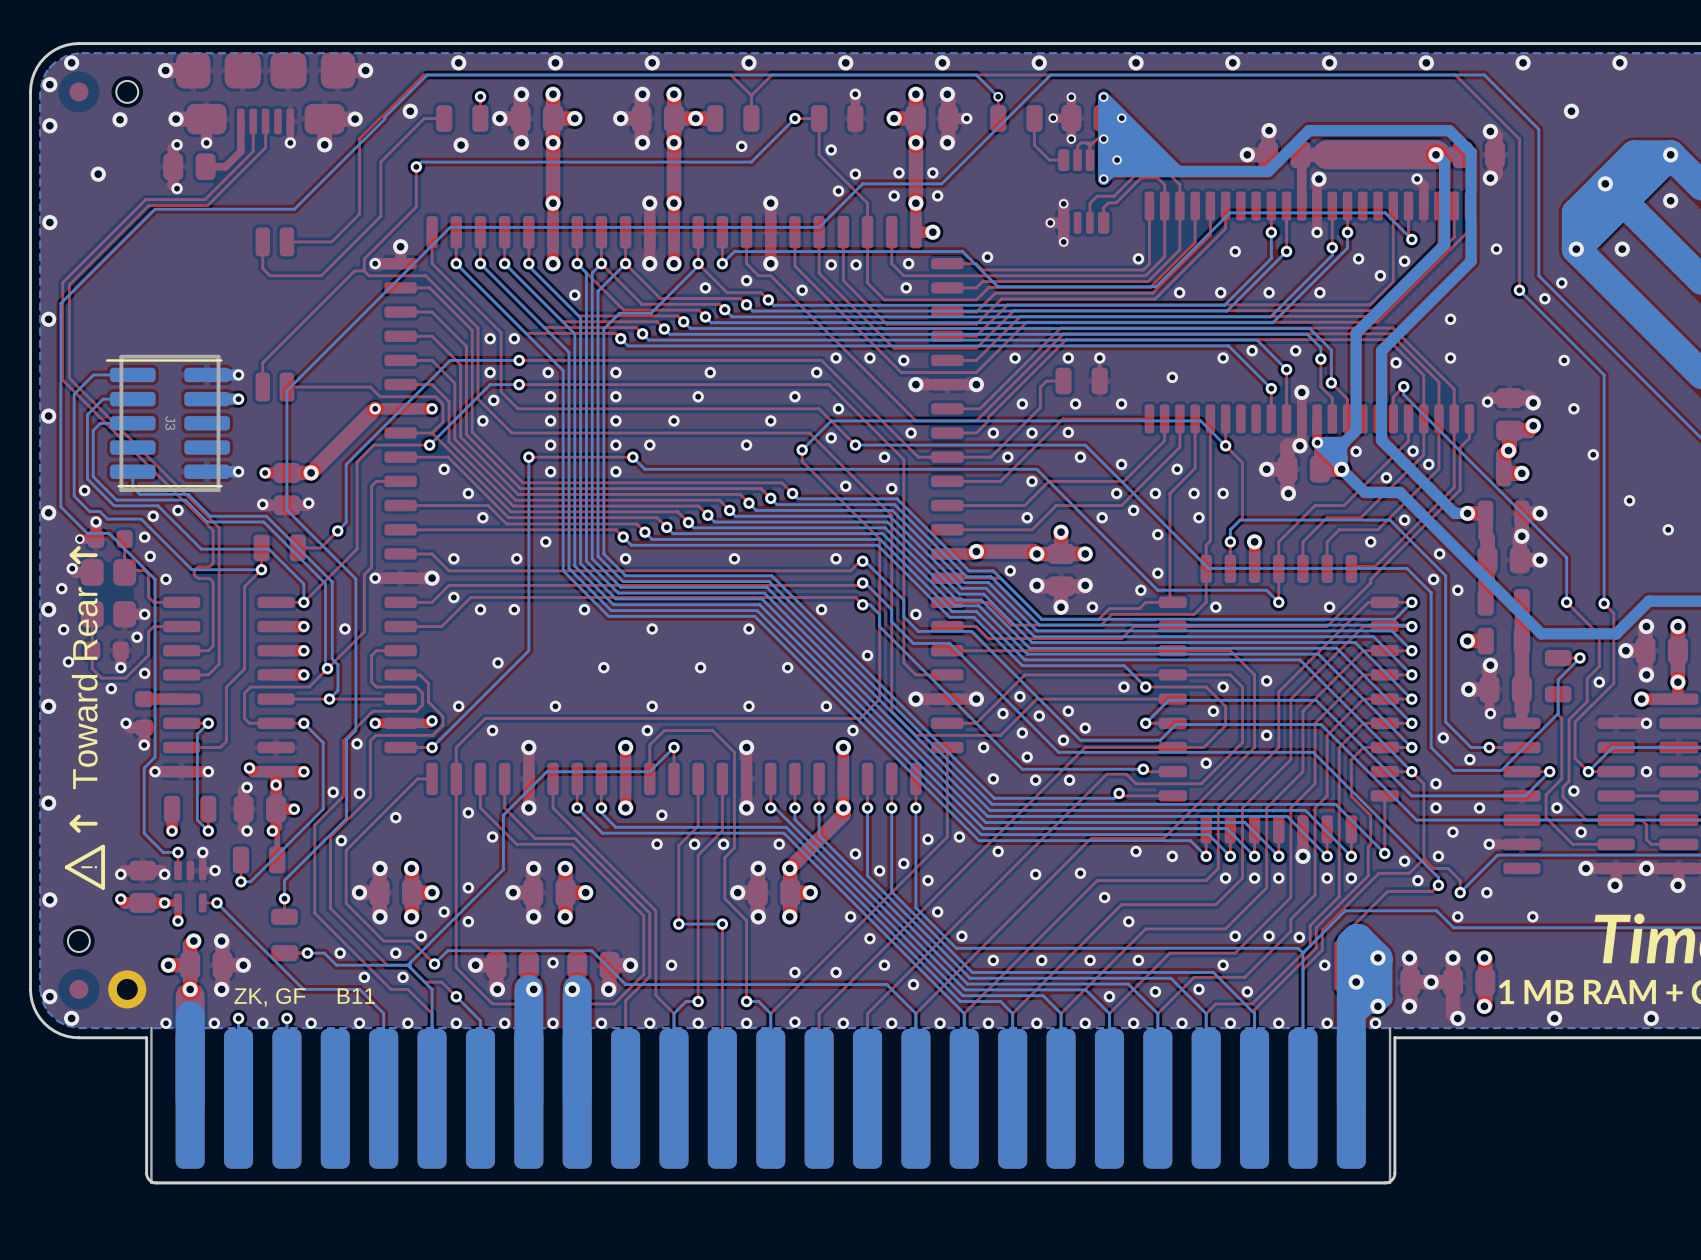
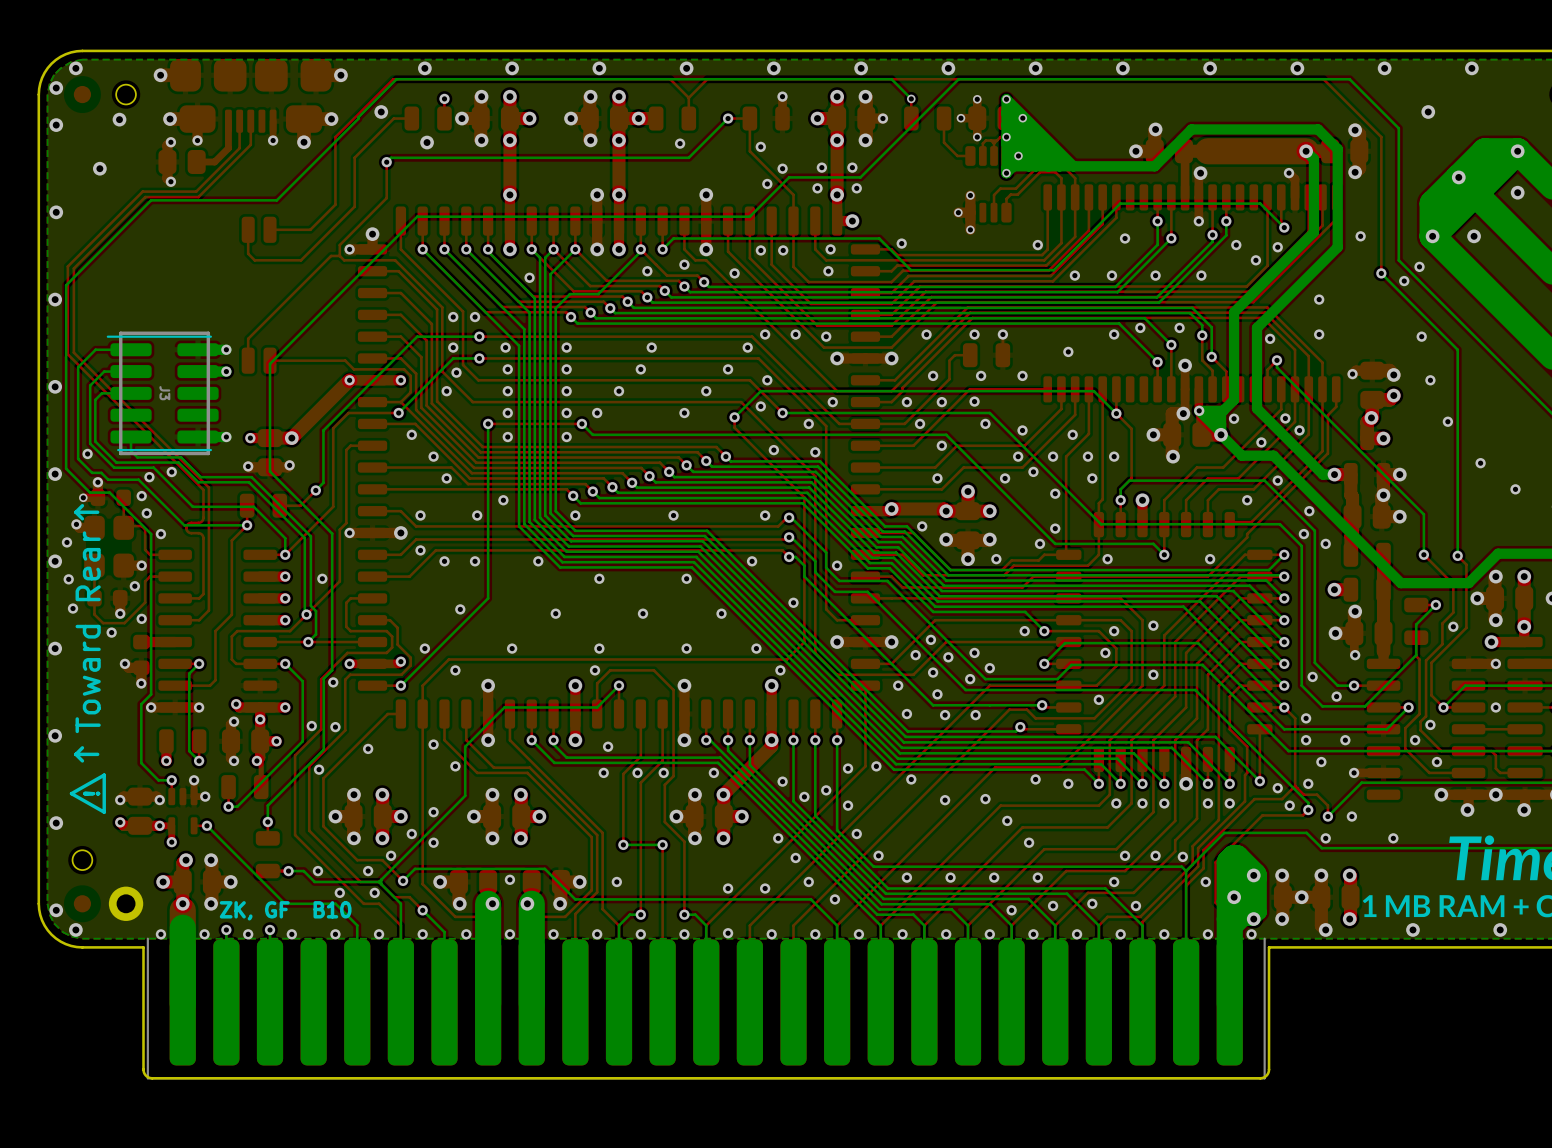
text: B11 (356, 996) -> B10 (332, 909)

